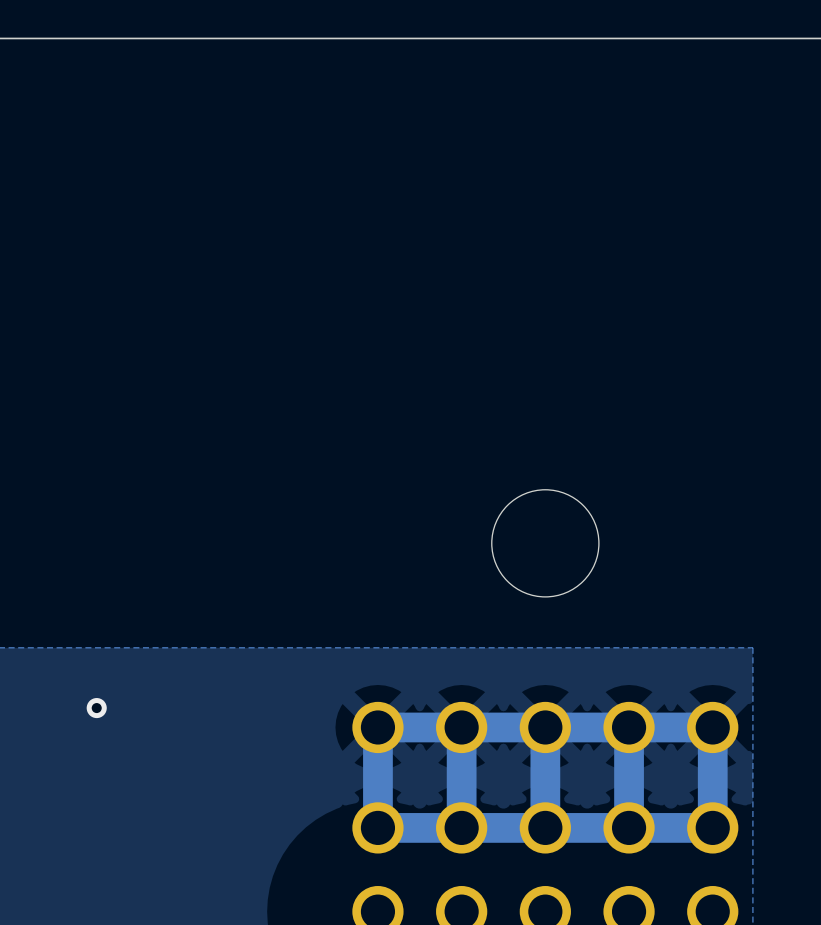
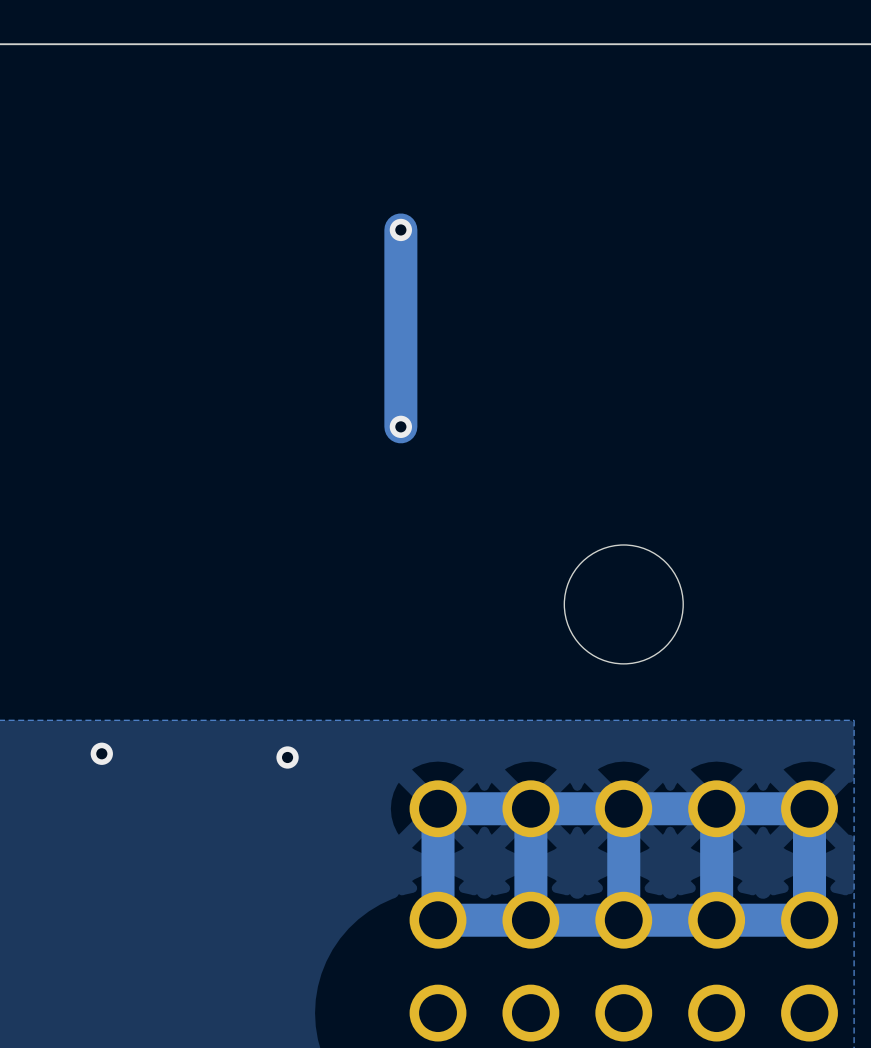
track: none -> (400, 229) (400, 426)
via: none -> (400, 229)
via: none -> (400, 426)
via: none -> (287, 757)
via position: (96, 708) -> (101, 753)

